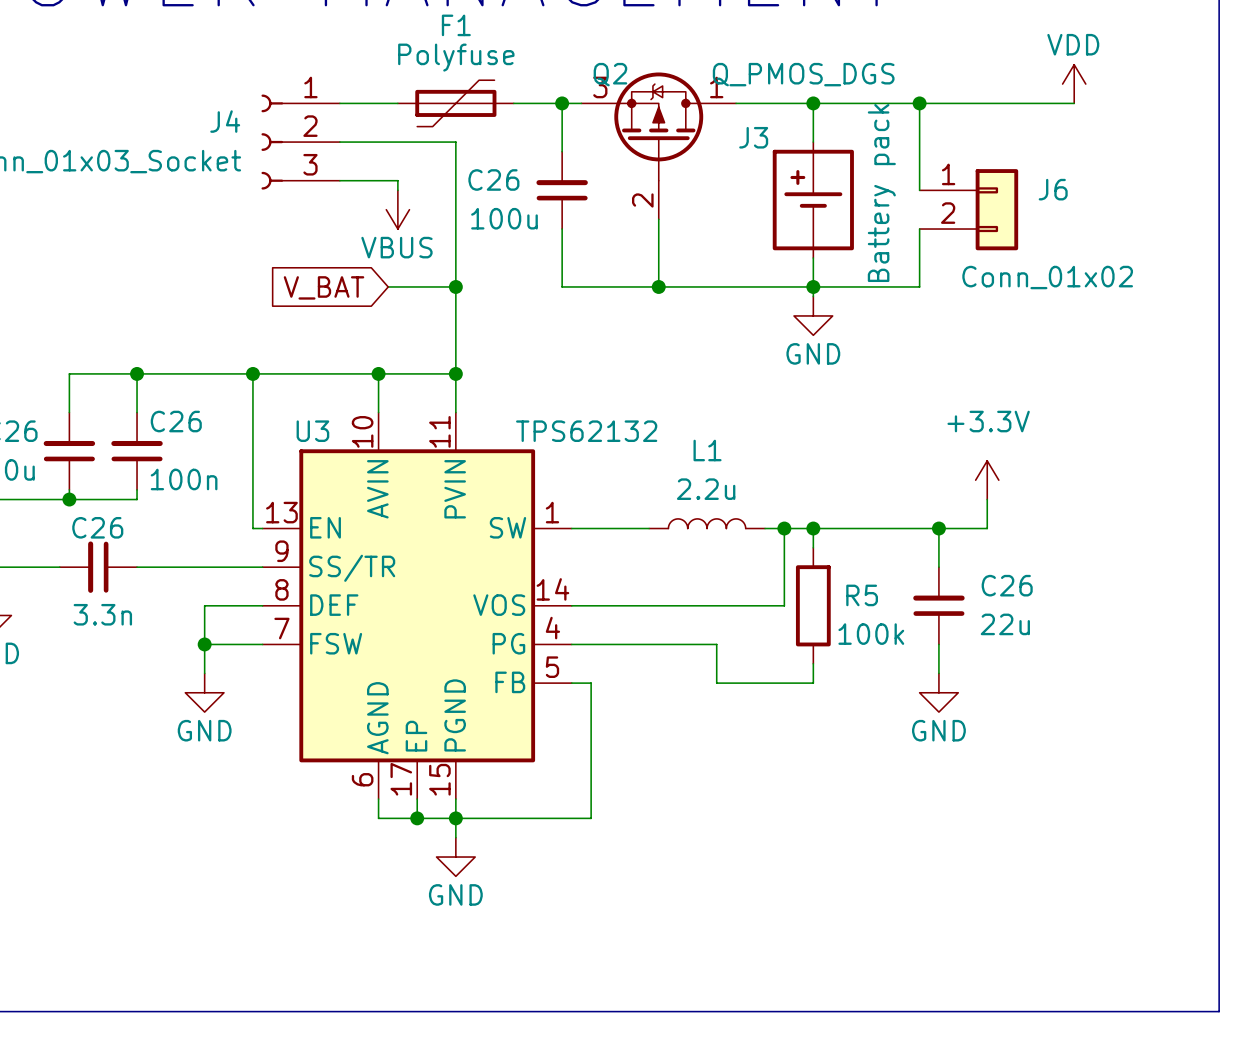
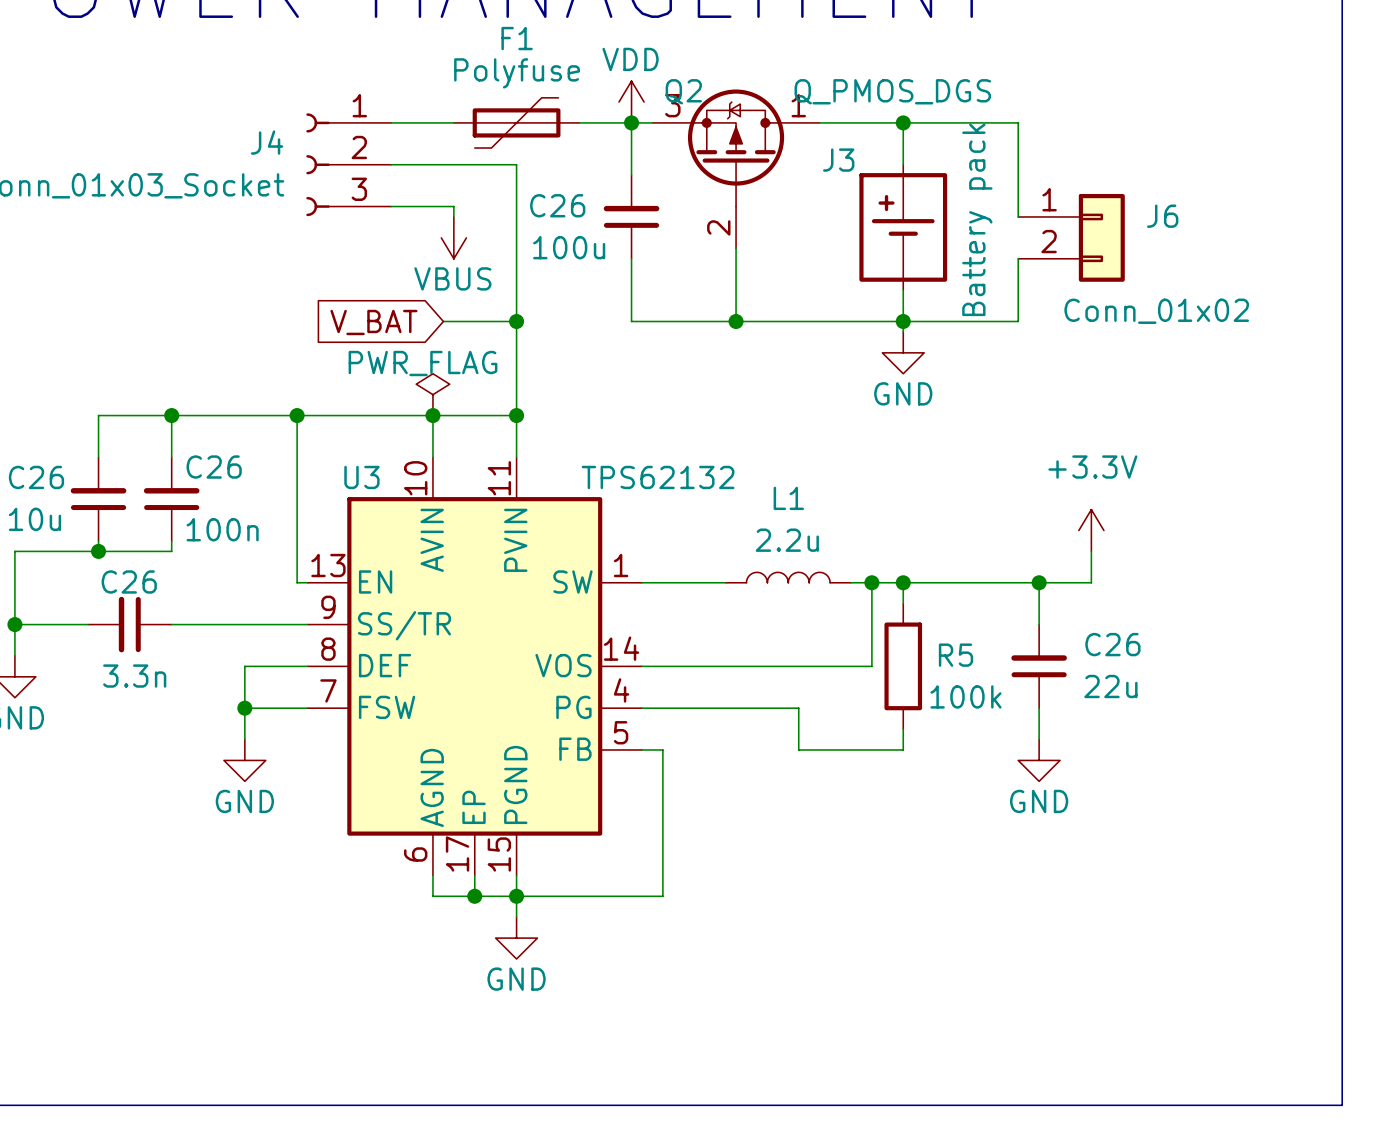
power symbol: none -> VDD (631, 102)
power symbol: VDD (1074, 84) -> none
wire: (919, 103) (1074, 103) -> none
junction: (919, 103) -> none
power symbol: none -> PWR_FLAG (432, 394)

